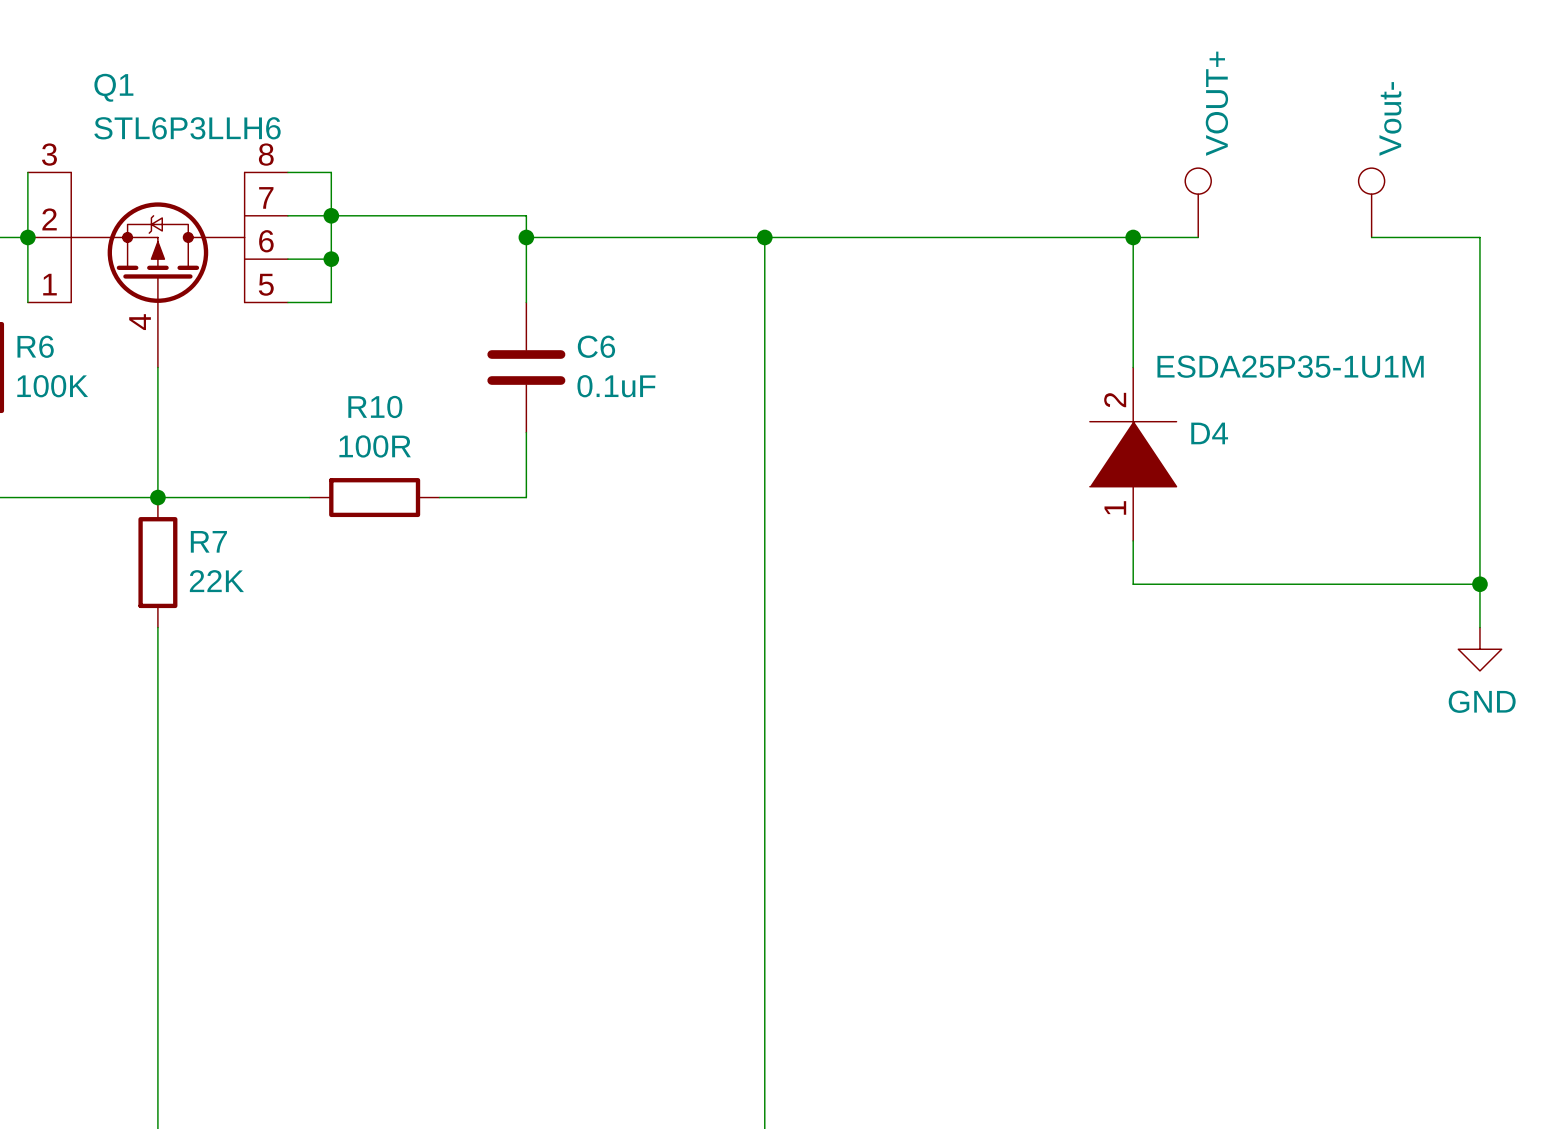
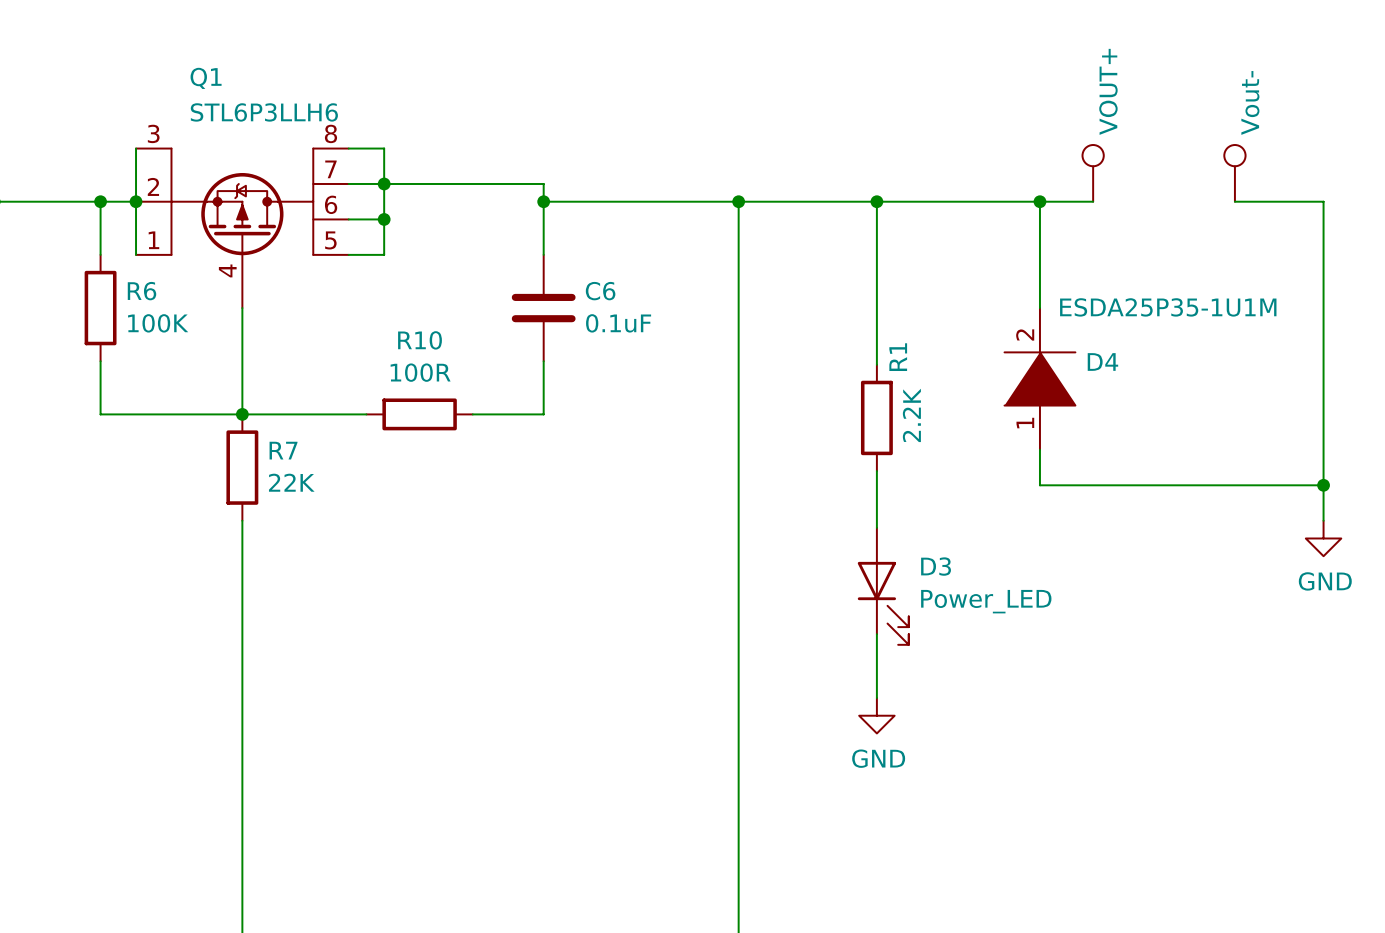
wire: none -> (876, 201) (876, 364)
junction: none -> (876, 201)
R1: none -> 2.2K (876, 417)
wire: none -> (876, 471) (876, 527)
D3: none -> Power_LED (883, 586)
wire: none -> (876, 634) (876, 698)
power symbol: none -> GND (876, 715)

